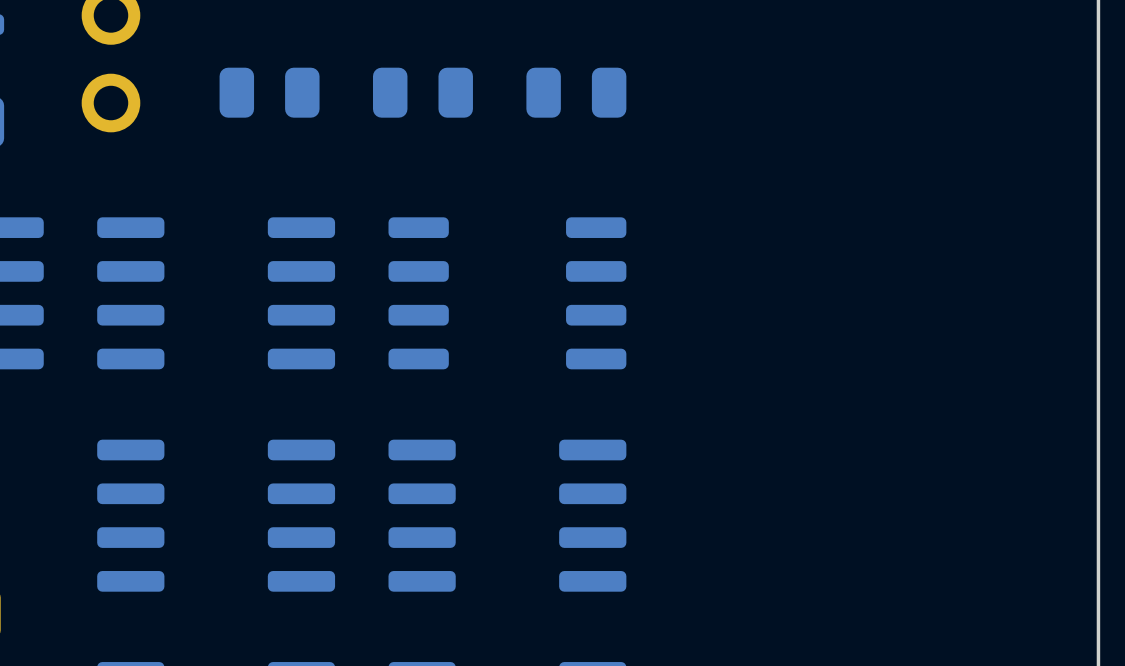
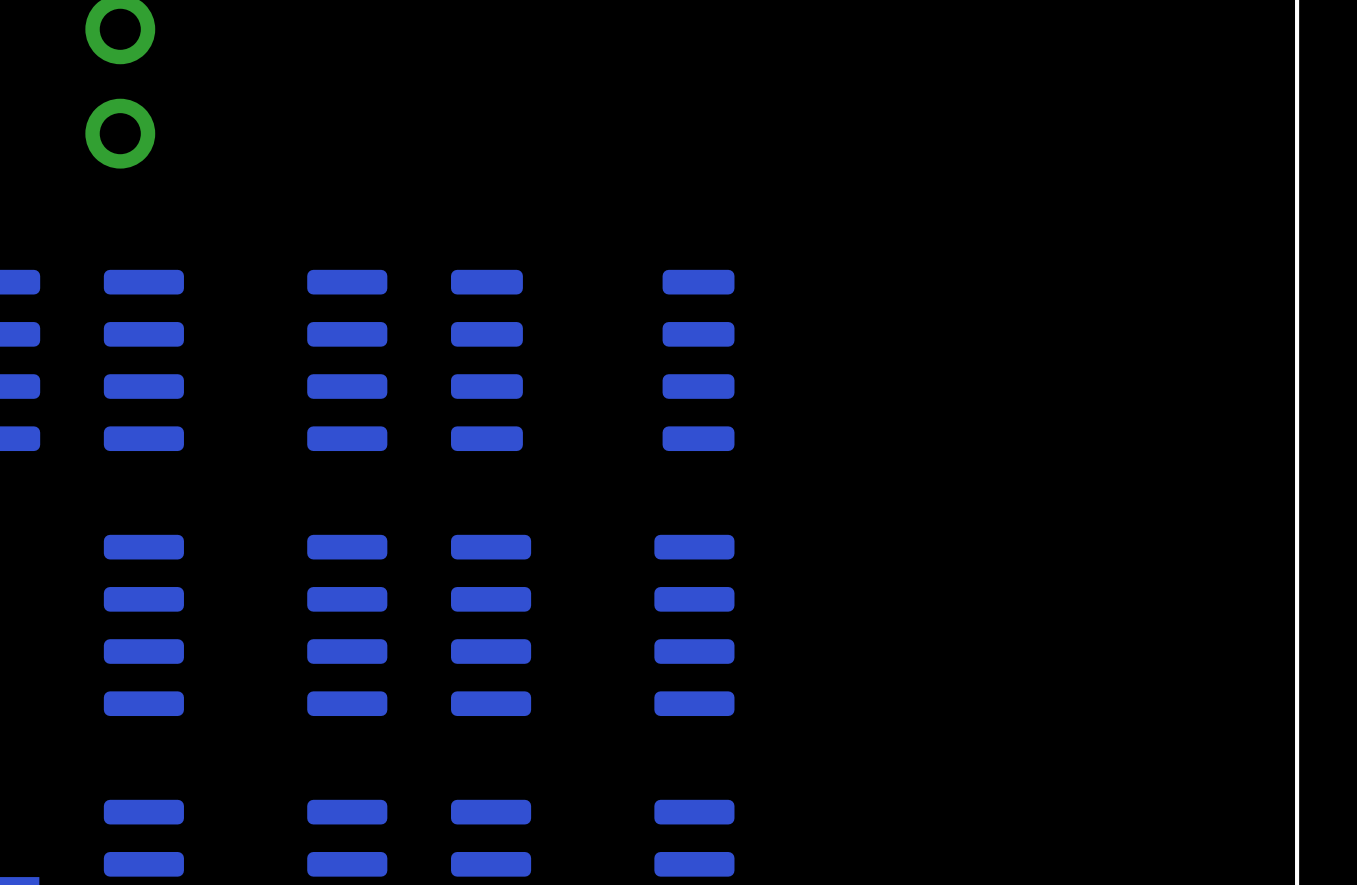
part: (269, 92) -> none
part: (422, 92) -> none
part: (576, 92) -> none

